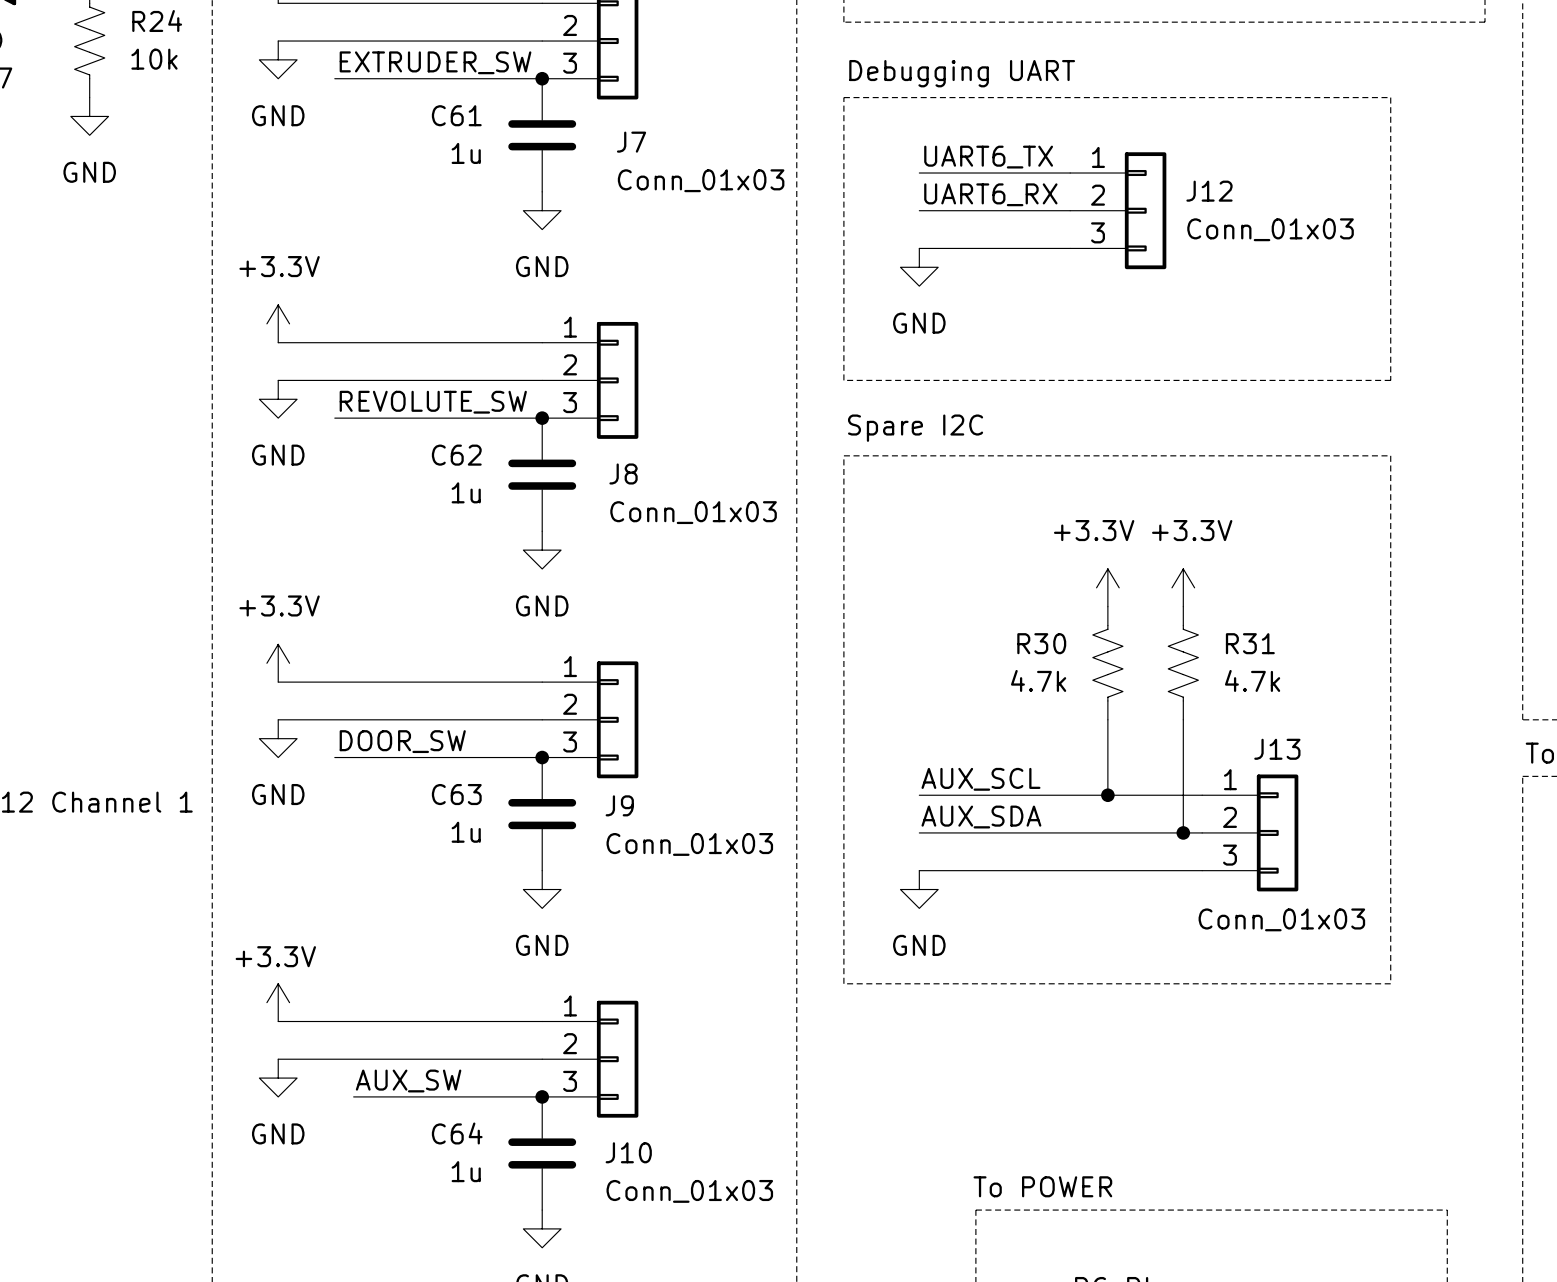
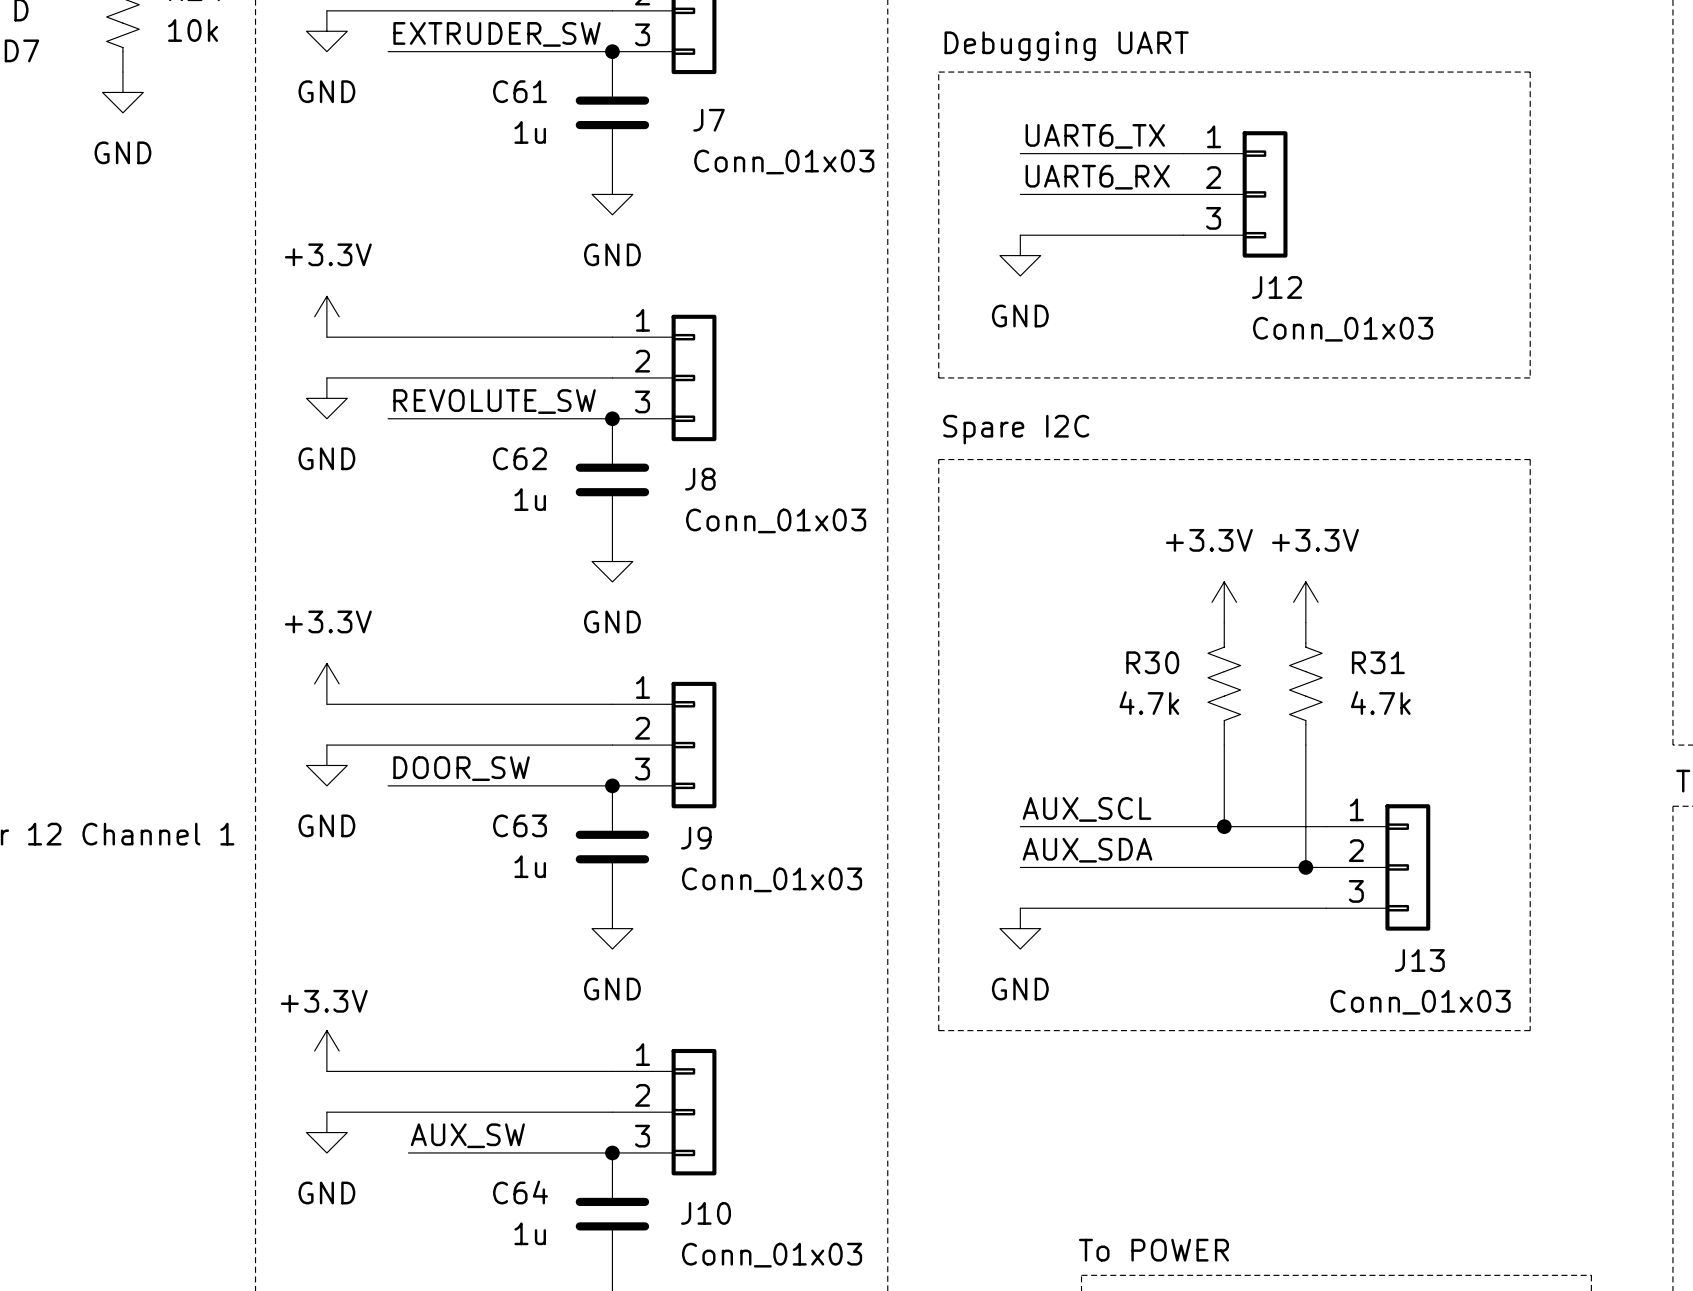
J12 name position: J12 (1209, 191) -> J12 (1277, 287)
J12 value position: Conn_01x03 (1270, 229) -> Conn_01x03 (1343, 329)
J13 name position: J13 (1277, 749) -> J13 (1419, 960)
J13 value position: Conn_01x03 (1281, 919) -> Conn_01x03 (1420, 1002)

